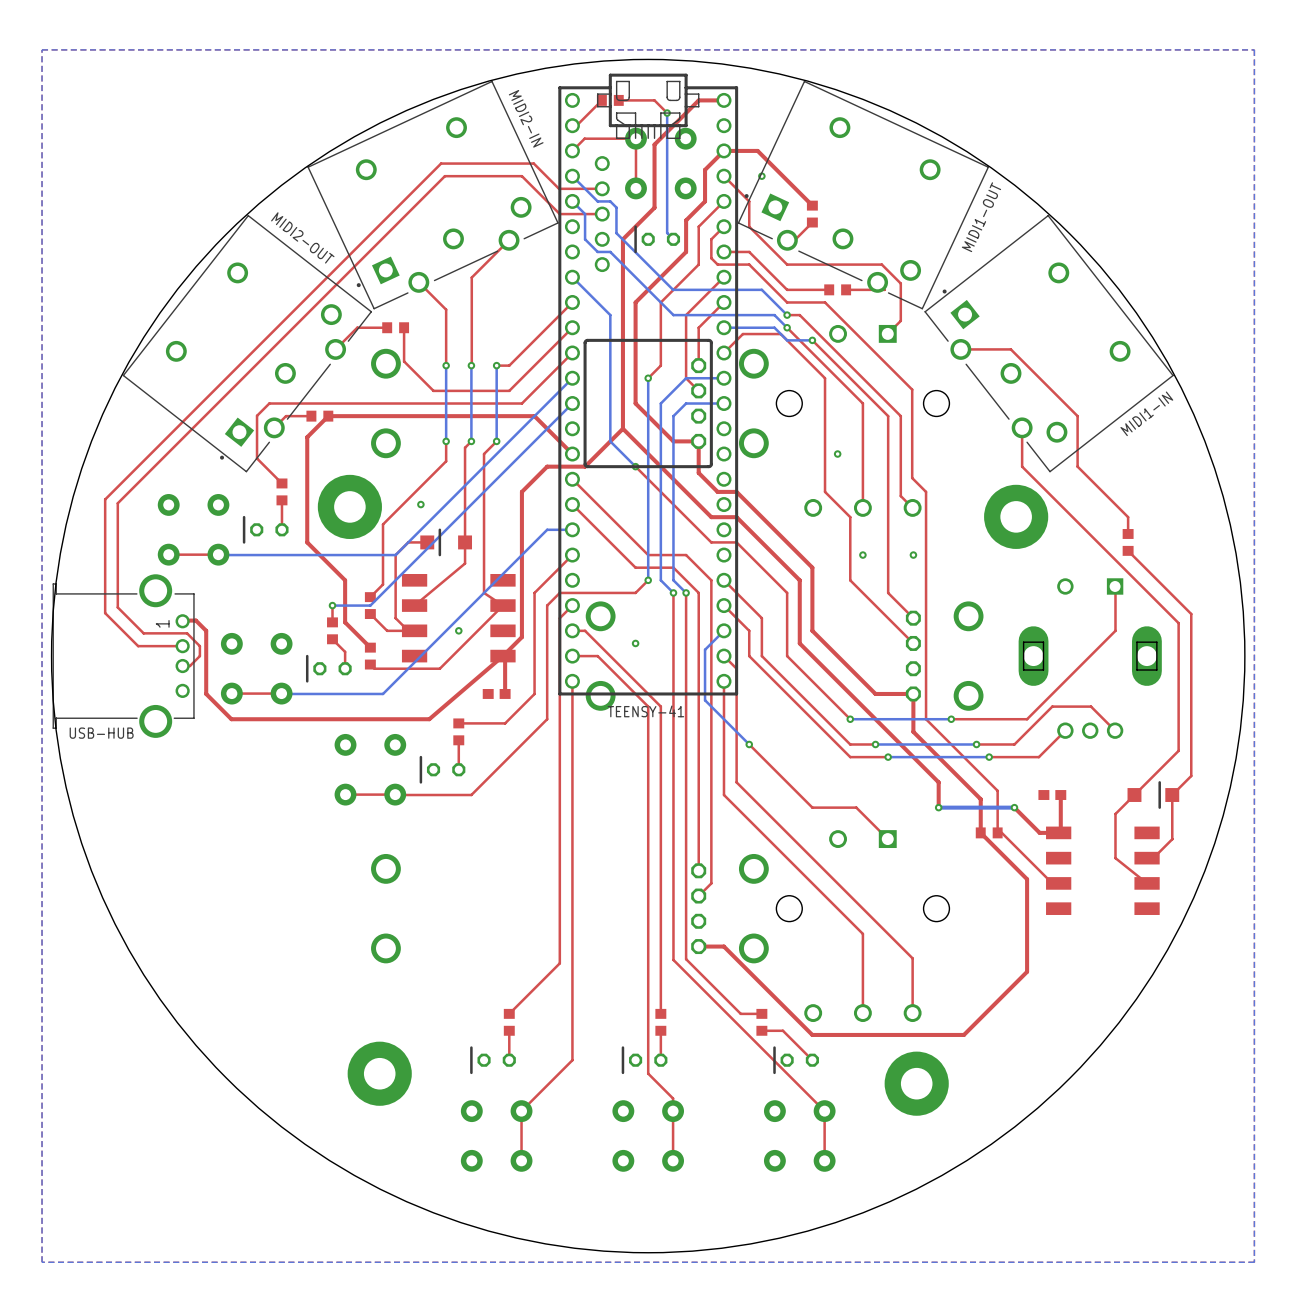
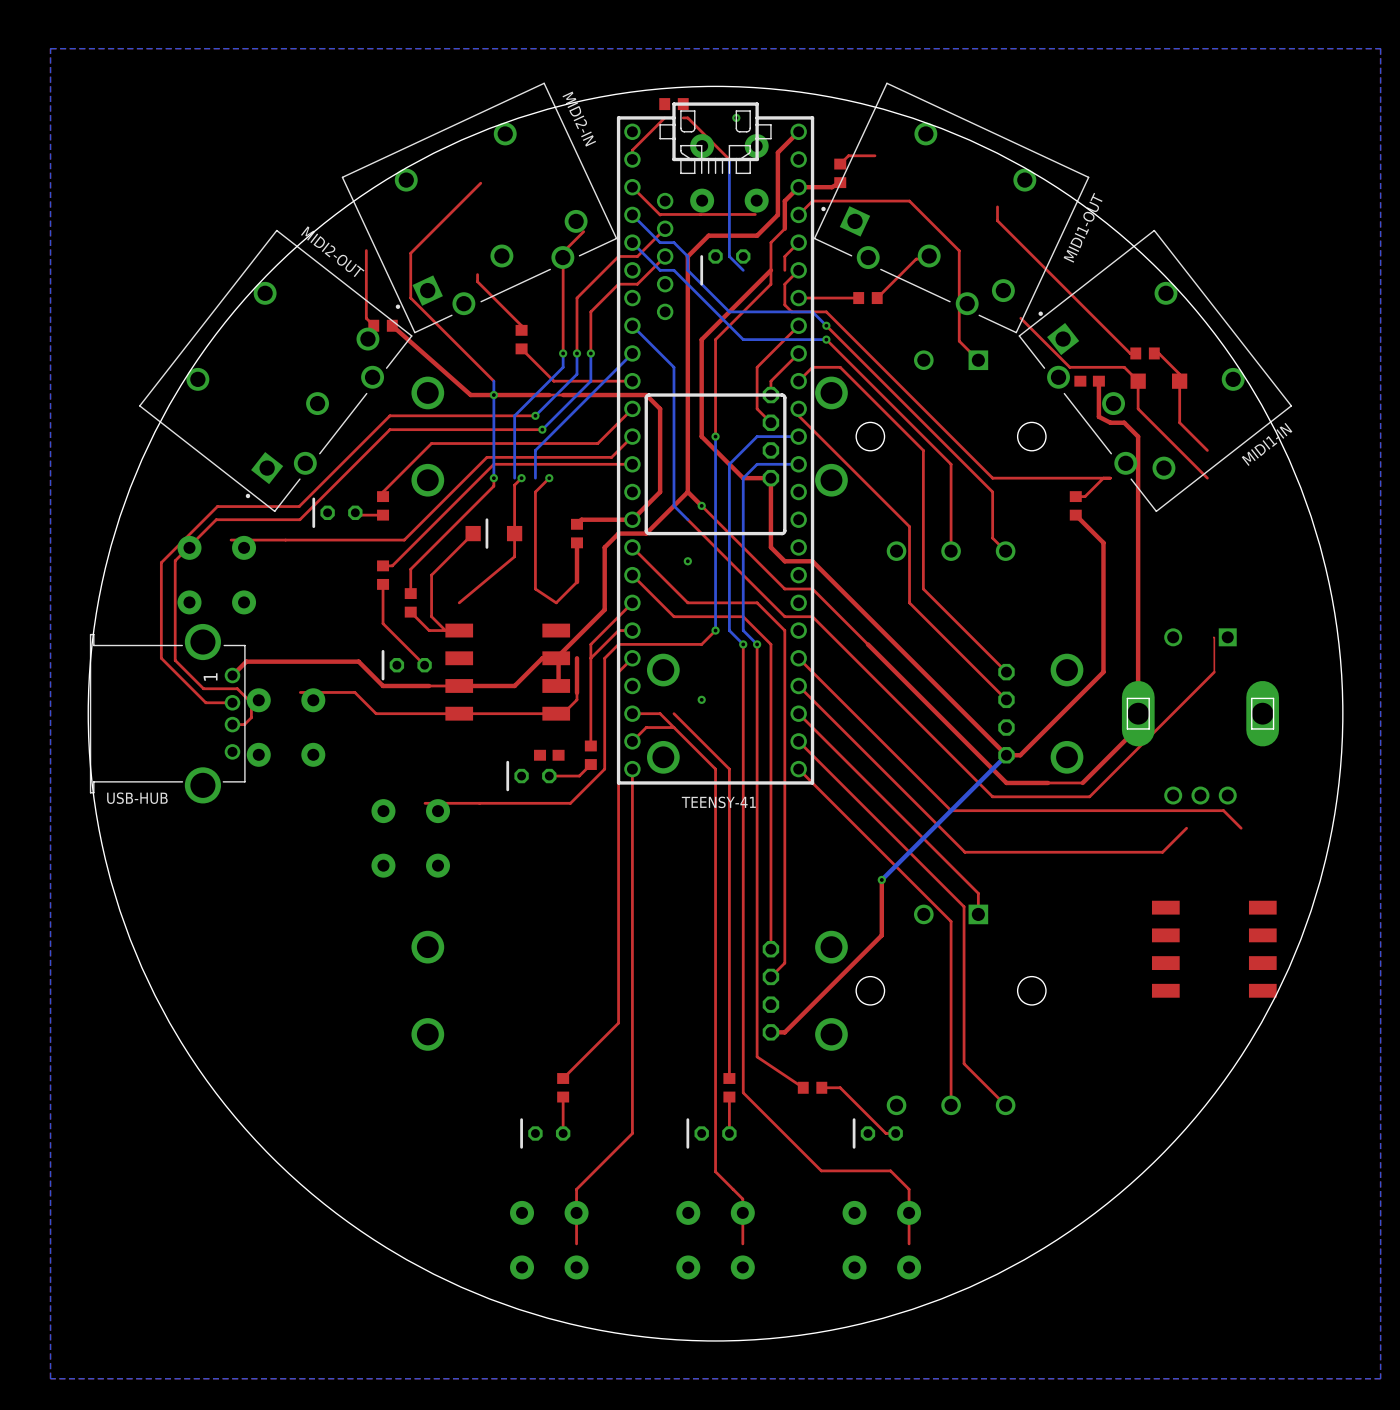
round board edge size: [51, 59, 1245, 1253] -> [88, 86, 1343, 1342]
top track: (601, 100) (576, 125) (572, 125) -> none
top track: (618, 100) (654, 100) (667, 113) -> none
top track: (723, 100) (698, 100) (654, 144) (654, 207) (641, 220) -> (757, 235) (708, 235)
top track: none -> (683, 117) (687, 117) (729, 159)
bottom track: (667, 113) (667, 233) (673, 239) -> none
top track: none -> (874, 155) (848, 155) (840, 164)
top track: (572, 150) (584, 138) (635, 138) (635, 188) -> (632, 159) (632, 150) (664, 117)
bottom track: none -> (729, 159) (729, 256) (743, 270)
part: none -> (840, 173)
top track: (705, 169) (723, 150) (757, 150) (812, 205) -> (777, 180) (777, 152) (798, 131)
top track: none -> (480, 183) (410, 253) (410, 298) (493, 381)
bottom track: (572, 176) (597, 201) (610, 201) (616, 207) (616, 233) (673, 289) -> (646, 228) (660, 242) (673, 242) (687, 256) (687, 270) (729, 311) (742, 311)
top track: none -> (632, 187) (660, 214) (755, 214)
top track: (723, 176) (749, 201) (749, 226) (787, 264) (881, 264) (900, 283) (900, 320) (887, 333) -> (798, 214) (812, 201) (909, 201) (959, 250) (959, 341) (978, 360)
via: (761, 176) -> none
top track: (602, 188) (559, 188) (533, 163) (441, 163) (105, 499) (105, 613) (138, 646) (182, 646) -> none
top track: none -> (997, 206) (997, 220) (1130, 353) (1135, 353)
top track: (723, 201) (711, 214) -> (840, 182) (831, 187) (798, 187) (784, 201) (784, 228)
bottom track: (585, 214) (585, 239) -> (632, 242) (646, 256)
top track: (602, 214) (559, 214) (521, 176) (444, 176) (117, 503) (117, 607) (143, 633) (181, 633) -> (542, 429) (389, 429) (299, 519) (216, 519) (175, 560) (175, 660) (203, 688)
top track: none -> (665, 228) (637, 256) (618, 256) (577, 298) (577, 353)
part: (812, 214) -> none
top track: none -> (583, 231) (563, 252) (563, 353)
top track: (686, 220) (686, 251) (635, 302) (635, 315) -> (770, 270) (701, 339)
top track: (812, 222) (796, 238) (787, 240) -> none
line: (635, 226) (635, 239) -> (701, 270) (701, 284)
top track: none -> (366, 250) (366, 318) (373, 325)
top track: none -> (665, 256) (637, 284) (618, 284) (590, 311) (590, 353)
top track: (509, 240) (471, 277) (471, 365) -> none
top track: none -> (922, 259) (916, 259) (877, 298)
top track: (711, 251) (711, 258) (717, 264) (749, 264) (787, 302) (825, 302) (912, 389) (912, 478) (926, 491) (926, 719) (997, 790) (997, 832) (1001, 832) (1052, 883) (1058, 883) -> none
top track: (723, 251) (749, 251) (787, 289) (829, 289) -> (798, 270) (784, 284) (784, 304) (791, 311) (826, 311) (867, 353)
top track: none -> (477, 274) (477, 281) (521, 325) (521, 330)
bottom track: (572, 277) (610, 315) (610, 340) -> (632, 325) (673, 367)
top track: (723, 277) (686, 315) (686, 340) -> (798, 298) (858, 298)
part: none -> (867, 298)
top track: (418, 282) (446, 309) (446, 365) -> none
top track: (877, 282) (884, 289) (846, 289) -> none
bottom track: (736, 289) (761, 289) (787, 315) -> (812, 311) (826, 325)
part: (837, 289) -> none
top track: none -> (1020, 318) (1069, 367) (1124, 367) (1138, 381)
part: none -> (383, 325)
top track: none -> (392, 325) (470, 395) (549, 395)
top track: (572, 302) (509, 365) -> (660, 492) (660, 408) (646, 395) (563, 395)
top track: (660, 302) (660, 365) (648, 378) -> (729, 325) (715, 339) (715, 436)
via: none -> (826, 325)
part: none -> (521, 339)
bottom track: (749, 315) (774, 315) (787, 327) -> none
via: none -> (826, 339)
top track: (787, 315) (799, 315) (900, 416) (900, 454) -> (909, 408) (992, 492)
via: (787, 315) -> none
top track: (387, 327) (357, 327) (335, 349) -> none
part: (395, 327) -> none
bottom track: none -> (563, 353) (563, 367) (514, 415) (514, 478)
via: none -> (563, 353)
bottom track: none -> (577, 353) (577, 374) (535, 415)
via: none -> (577, 353)
bottom track: none -> (590, 353) (590, 381) (542, 429)
via: none -> (590, 353)
bottom track: none -> (632, 353) (535, 450) (535, 478)
top track: (572, 327) (509, 390) (433, 390) (404, 361) (404, 327) -> none
top track: (698, 327) (698, 353) -> (770, 353) (757, 367)
bottom track: (723, 327) (774, 327) (787, 340) (812, 340) -> none
top track: none -> (798, 353) (770, 381)
via: (787, 327) -> none
part: none -> (1145, 353)
top track: none -> (1154, 353) (1158, 353) (1179, 374) (1179, 381)
top track: (780, 334) (742, 334) (736, 340) -> (861, 360) (826, 325)
top track: (812, 340) (888, 416) (888, 592) -> (812, 367) (840, 367) (923, 450) (923, 589) (978, 644)
via: (812, 340) -> none
top track: (960, 349) (1010, 349) (1077, 416) (1077, 466) (1128, 517) (1128, 533) -> none
bottom track: none -> (493, 381) (493, 395)
top track: (572, 352) (521, 403) (269, 403) (257, 415) (257, 458) (281, 483) -> (632, 381) (553, 381) (521, 348)
part: none -> (1089, 381)
part: none -> (1158, 381)
top track: none -> (1138, 381) (1138, 408) (1207, 478)
top track: none -> (1179, 381) (1179, 422) (1207, 450)
bottom track: (471, 365) (471, 441) -> none
via: (471, 365) -> none
bottom track: (496, 365) (496, 441) -> none
via: (496, 365) -> none
bottom track: (572, 378) (395, 555) (218, 554) -> none
top track: none -> (632, 408) (597, 443) (431, 443) (383, 492) (383, 496)
bottom track: (648, 378) (648, 403) -> none
via position: (648, 378) -> (715, 436)
bottom track: (723, 378) (686, 378) (660, 403) (660, 428) -> none
top track: (825, 378) (825, 485) -> (798, 408) (798, 415) (909, 526)
top track: none -> (535, 415) (389, 415) (299, 506) (217, 506) (161, 562) (161, 658) (205, 702) (232, 702)
via: none -> (535, 415)
TEENSY-41 position: (648, 384) -> (715, 443)
via: none -> (542, 429)
bottom track: (572, 403) (370, 605) (332, 605) -> none
top track: none -> (632, 436) (611, 457) (486, 457) (404, 540) (231, 540)
top track: (862, 403) (862, 428) -> (826, 339) (951, 464)
top track: none -> (951, 436) (992, 478) (1110, 478)
top track: (311, 416) (286, 416) (274, 427) -> none
part: (319, 416) -> none
bottom track: (673, 416) (673, 441) -> (743, 450) (729, 464)
top track: (1022, 427) (1022, 466) (1178, 623) (1178, 750) (1115, 814) (1115, 858) (1147, 883) -> none
top track: none -> (632, 464) (493, 464) (392, 565) (383, 565)
top track: none -> (687, 464) (687, 492)
bottom track: none -> (798, 464) (757, 464) (743, 478)
bottom track: (610, 441) (635, 466) -> (673, 478) (673, 505) (687, 519)
top track: none -> (1103, 478) (1085, 496) (1075, 496)
top track: (446, 448) (446, 461) (383, 524) (383, 584) (370, 597) -> (493, 486) (410, 569) (410, 593)
top track: (572, 454) (534, 416) (328, 416) (307, 437) (307, 542) (345, 580) (345, 622) (370, 647) -> none
top track: (597, 454) (622, 428) (698, 504) -> (770, 512) (770, 547)
top track: none -> (687, 492) (646, 533) (618, 533) (604, 547) (604, 609) (556, 658)
top track: none -> (687, 492) (701, 505)
via: (837, 454) -> none
part: none -> (383, 505)
top track: (585, 466) (547, 466) (521, 491) (521, 500) -> (646, 505) (632, 519) (581, 519) (577, 524)
part: none -> (1075, 505)
top track: none -> (355, 512) (357, 515) (383, 515)
top track: (698, 472) (717, 491) (736, 491) (812, 567) (812, 630) (875, 693) (913, 693) (913, 731) (980, 799) (980, 832) (1027, 879) (1027, 971) (963, 1034) (812, 1034) (723, 946) (711, 946) -> (881, 879) (881, 935) (784, 1032)
top track: (572, 479) (648, 555) -> none
top track: none -> (687, 519) (784, 616) (812, 616) (992, 796) (1089, 796) (1214, 672) (1213, 637)
part: (281, 491) -> none
top track: none -> (473, 533) (431, 575) (431, 616) (445, 630)
part: none -> (577, 533)
top track: (825, 491) (850, 517) (850, 580) -> (909, 533) (909, 602) (937, 630)
top track: (281, 500) (281, 529) -> none
via: (420, 504) -> none
part: (349, 506) -> none
top track: (465, 513) (465, 563) (414, 605) -> (514, 556) (459, 602)
part: (1016, 516) -> none
line: (244, 517) (244, 542) -> (313, 498) (313, 526)
via: none -> (687, 561)
part position: (269, 529) -> (341, 512)
part: none -> (383, 575)
line: (439, 529) (439, 555) -> (486, 519) (486, 547)
bottom track: (572, 529) (547, 529) (383, 693) (281, 693) -> none
top track: none -> (632, 575) (673, 616) (701, 616)
top track: (521, 536) (521, 605) -> (577, 582) (556, 602) (535, 589)
top track: none -> (383, 584) (383, 623) (424, 665)
top track: (427, 542) (408, 542) (395, 555) (395, 618) (408, 630) -> none
part position: (446, 542) -> (493, 533)
top track: (484, 542) (484, 592) (502, 605) (439, 668) (374, 668) (370, 664) -> none
part: (1128, 542) -> none
top track: (1128, 550) (1191, 614) (1191, 776) (1172, 795) (1172, 839) (1153, 858) (1147, 858) -> none
top track: (218, 554) (168, 554) -> none
part: none -> (410, 602)
top track: (622, 555) (635, 567) -> (687, 602) (715, 602)
via: (862, 555) -> none
via: (913, 555) -> none
top track: none -> (410, 612) (429, 630) (459, 630)
top track: none -> (632, 630) (618, 630) (590, 658)
top track: (723, 580) (761, 618) (761, 656) (850, 744) (862, 744) -> (826, 685) (951, 810)
top track: (799, 580) (799, 643) (938, 782) (938, 807) -> (881, 630) (1006, 755) (1020, 755) (1103, 672) (1103, 542) (1075, 515)
top track: (1115, 586) (1115, 630) (1027, 719) (982, 719) -> (1098, 381) (1098, 416) (1110, 422) (1124, 422) (1138, 436) (1138, 727) (1082, 782)
part footprint: [364, 592, 376, 620] -> [389, 657, 432, 673]
top track: (787, 592) (787, 656) (850, 719) -> (867, 644) (1006, 782) (1048, 782)
top track: (332, 605) (332, 622) -> none
via: (332, 605) -> none
top track: none -> (556, 658) (542, 658) (514, 685) (459, 685)
top track: none -> (556, 658) (558, 660) (558, 685)
top track: (370, 614) (387, 630) -> (232, 675) (246, 661) (358, 661) (383, 685) (429, 685)
top track: (182, 621) (195, 620) (206, 630) (206, 693) (231, 719) (429, 719) (502, 656) -> none
part: (332, 630) -> none
via: (458, 630) -> none
top track: (572, 630) (585, 630) (610, 656) -> none
bottom track: (723, 630) (705, 649) (705, 700) (749, 744) -> none
top track: (749, 630) (749, 656) -> (798, 685) (826, 713)
top track: (187, 633) (199, 646) (199, 656) (189, 666) (182, 666) -> (209, 688) (237, 688) (251, 702) (251, 717) (244, 724) (232, 724)
top track: (521, 637) (502, 656) -> (577, 692) (577, 699) (563, 713) (376, 713) (354, 692) (300, 692)
top track: (332, 639) (345, 651) (345, 668) -> none
USB-HUB position: (123, 656) -> (167, 713)
line: (307, 656) (307, 681) -> (383, 651) (383, 679)
part: (370, 656) -> none
top track: (502, 656) (505, 658) (505, 693) -> none
part: (332, 668) -> none
top track: (736, 668) (736, 782) (912, 958) (912, 1013) -> (798, 741) (964, 906) (964, 1063) (1005, 1105)
top track: (572, 681) (572, 706) -> (632, 741) (646, 727) (673, 727)
top track: (723, 681) (723, 795) (862, 933) -> (798, 769) (951, 921) (951, 1018)
top track: (534, 685) (534, 693) (505, 723) (458, 723) -> none
top track: (281, 693) (231, 693) -> none
part: none -> (590, 755)
bottom track: none -> (1006, 755) (881, 879)
top track: none -> (590, 764) (579, 776) (549, 776)
top track: (547, 706) (547, 719) (471, 795) (345, 794) -> (604, 769) (570, 803) (425, 803)
via: (850, 719) -> none
bottom track: (951, 719) (850, 719) -> none
via: (951, 719) -> none
top track: (1065, 730) (1038, 757) (989, 757) -> none
top track: (1115, 730) (1091, 706) (1052, 706) (1014, 744) -> (1241, 828) (1223, 810) (1117, 810)
part: (458, 731) -> none
top track: (458, 740) (458, 769) -> none
top track: (749, 744) (812, 807) (856, 807) (887, 839) -> (812, 727) (978, 893) (978, 914)
via: (749, 744) -> none
via: (875, 744) -> none
bottom track: (976, 744) (875, 744) -> none
top track: none -> (1075, 810) (964, 810)
via: (976, 744) -> none
line: (420, 757) (420, 782) -> (507, 762) (507, 789)
top track: (888, 757) (850, 757) -> (1186, 828) (1162, 852) (964, 852) (937, 824)
via: (888, 757) -> none
bottom track: (989, 757) (888, 757) -> none
via: (989, 757) -> none
part position: (446, 769) -> (535, 776)
line: (1159, 782) (1159, 807) -> none
part: (1052, 795) -> none
top track: (1060, 795) (1060, 828) (1058, 832) (1039, 832) (1014, 807) -> none
part: (1153, 795) -> none
via: none -> (881, 879)
via: (938, 807) -> none
bottom track: (1014, 807) (938, 807) -> none
via: (1014, 807) -> none
part: (989, 832) -> none
top track: (559, 938) (559, 963) (509, 1013) -> (618, 1023) (563, 1078)
top track: (673, 959) (824, 1111) -> (743, 1047) (743, 1092) (821, 1170) (890, 1170) (909, 1189) (909, 1212)
top track: (686, 959) (740, 1013) (761, 1013) -> (757, 1046) (757, 1056) (803, 1087)
top track: (660, 988) (660, 1005) -> (729, 1106) (729, 1124)
top track: none -> (821, 1087) (840, 1087) (885, 1133) (895, 1133)
top track: none -> (563, 1097) (563, 1124)
part position: (509, 1022) -> (563, 1087)
part position: (660, 1022) -> (729, 1087)
part rotation: 0° (761, 1022) -> 90° clockwise (812, 1087)
part position: (761, 1022) -> (812, 1087)
top track: (761, 1030) (782, 1030) (812, 1060) -> none
top track: (509, 1038) (509, 1060) -> none
top track: (572, 1038) (572, 1060) (521, 1111) -> (632, 1133) (576, 1189) (576, 1212)
top track: (660, 1038) (660, 1060) -> none
line: (471, 1051) (471, 1072) -> (521, 1119) (521, 1143)
line: (622, 1051) (622, 1072) -> (687, 1119) (687, 1143)
line: (774, 1051) (774, 1072) -> (854, 1119) (854, 1143)
part position: (496, 1060) -> (549, 1133)
part position: (648, 1060) -> (715, 1133)
part position: (799, 1060) -> (881, 1133)
part: (379, 1073) -> none
part: (916, 1083) -> none
top track: (521, 1139) (521, 1160) -> none
top track: (673, 1139) (673, 1160) -> none
top track: (824, 1139) (824, 1160) -> none

